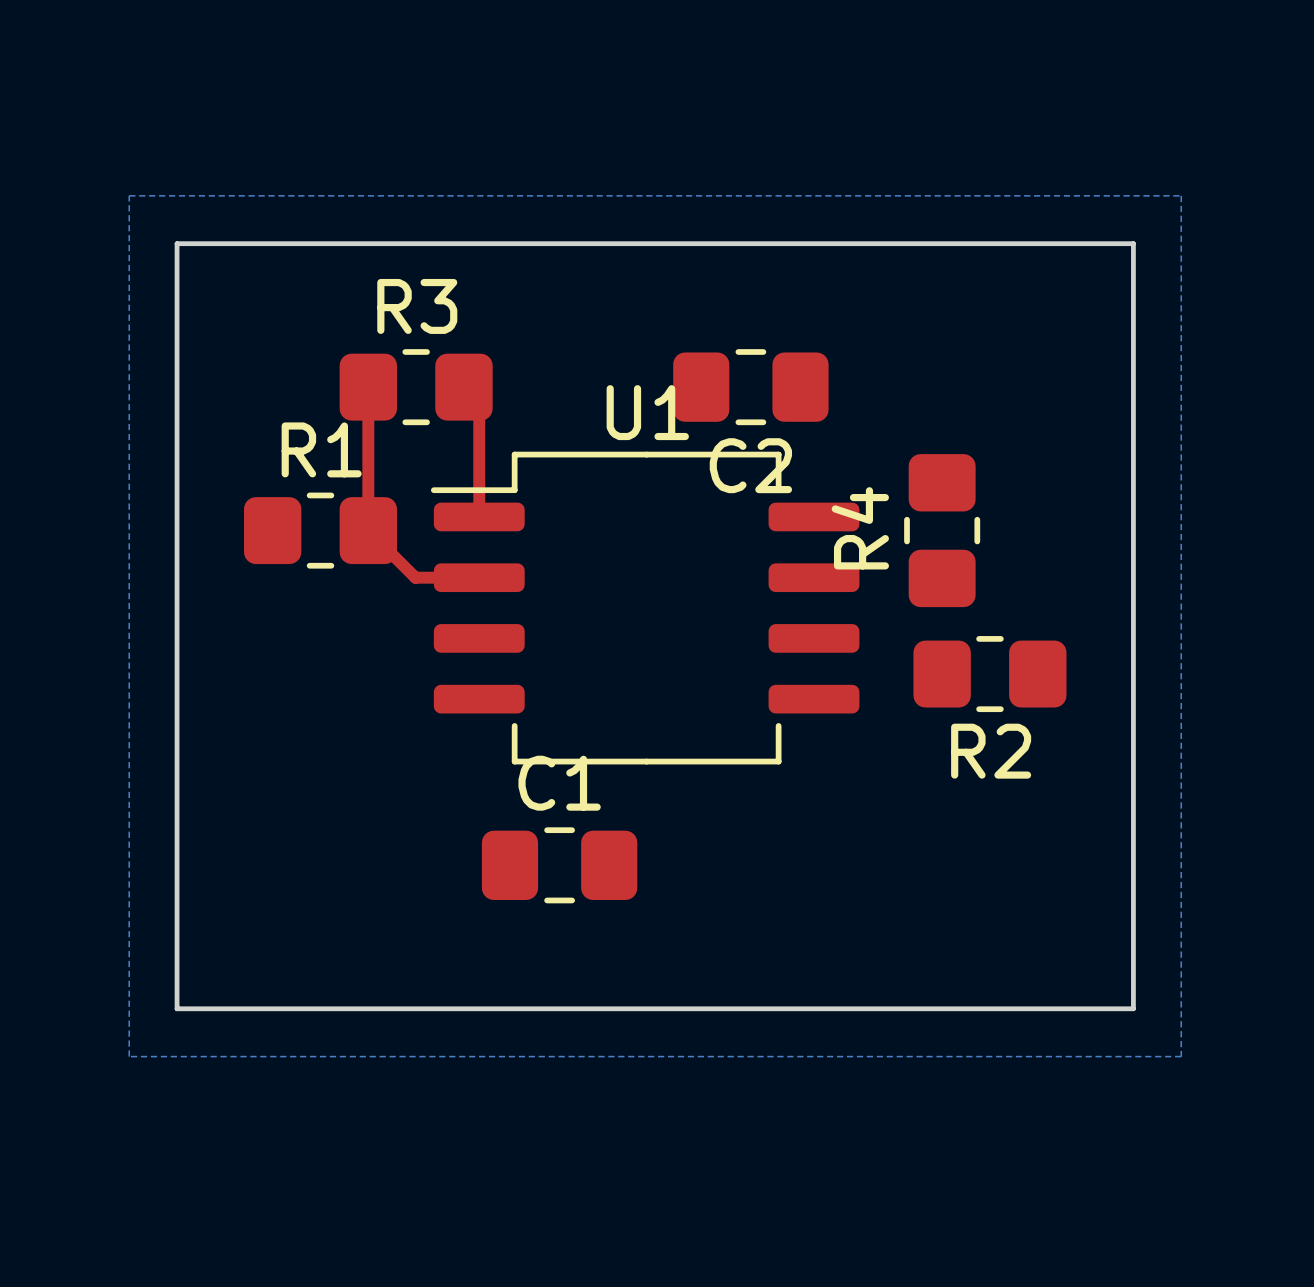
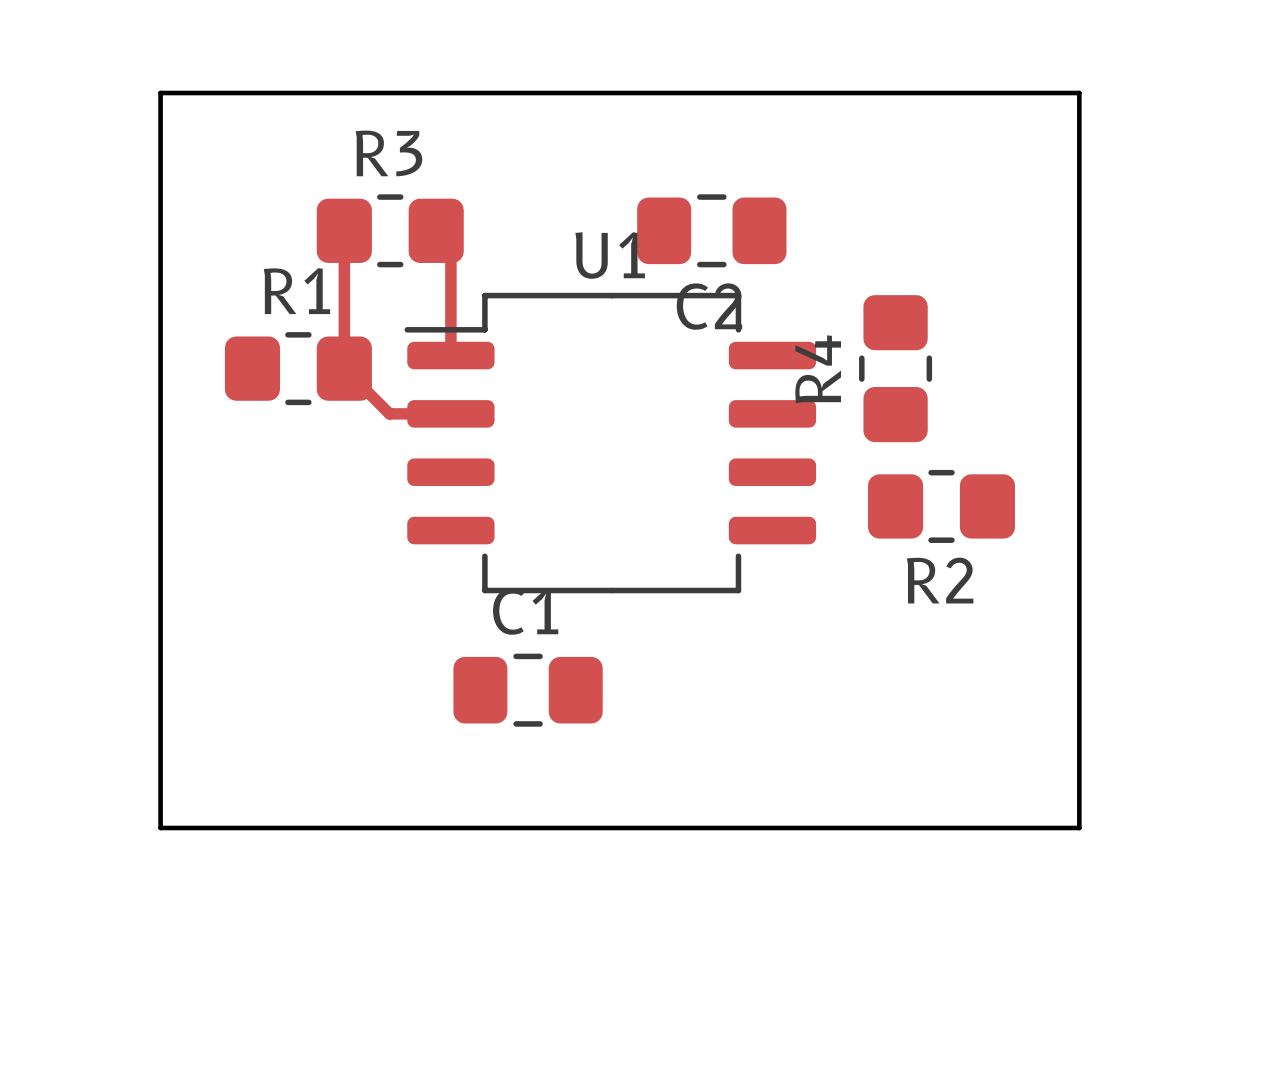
bottom zone outline: (129, 195) (129, 1056) (1181, 1056) (1181, 195) (129, 195) -> none

